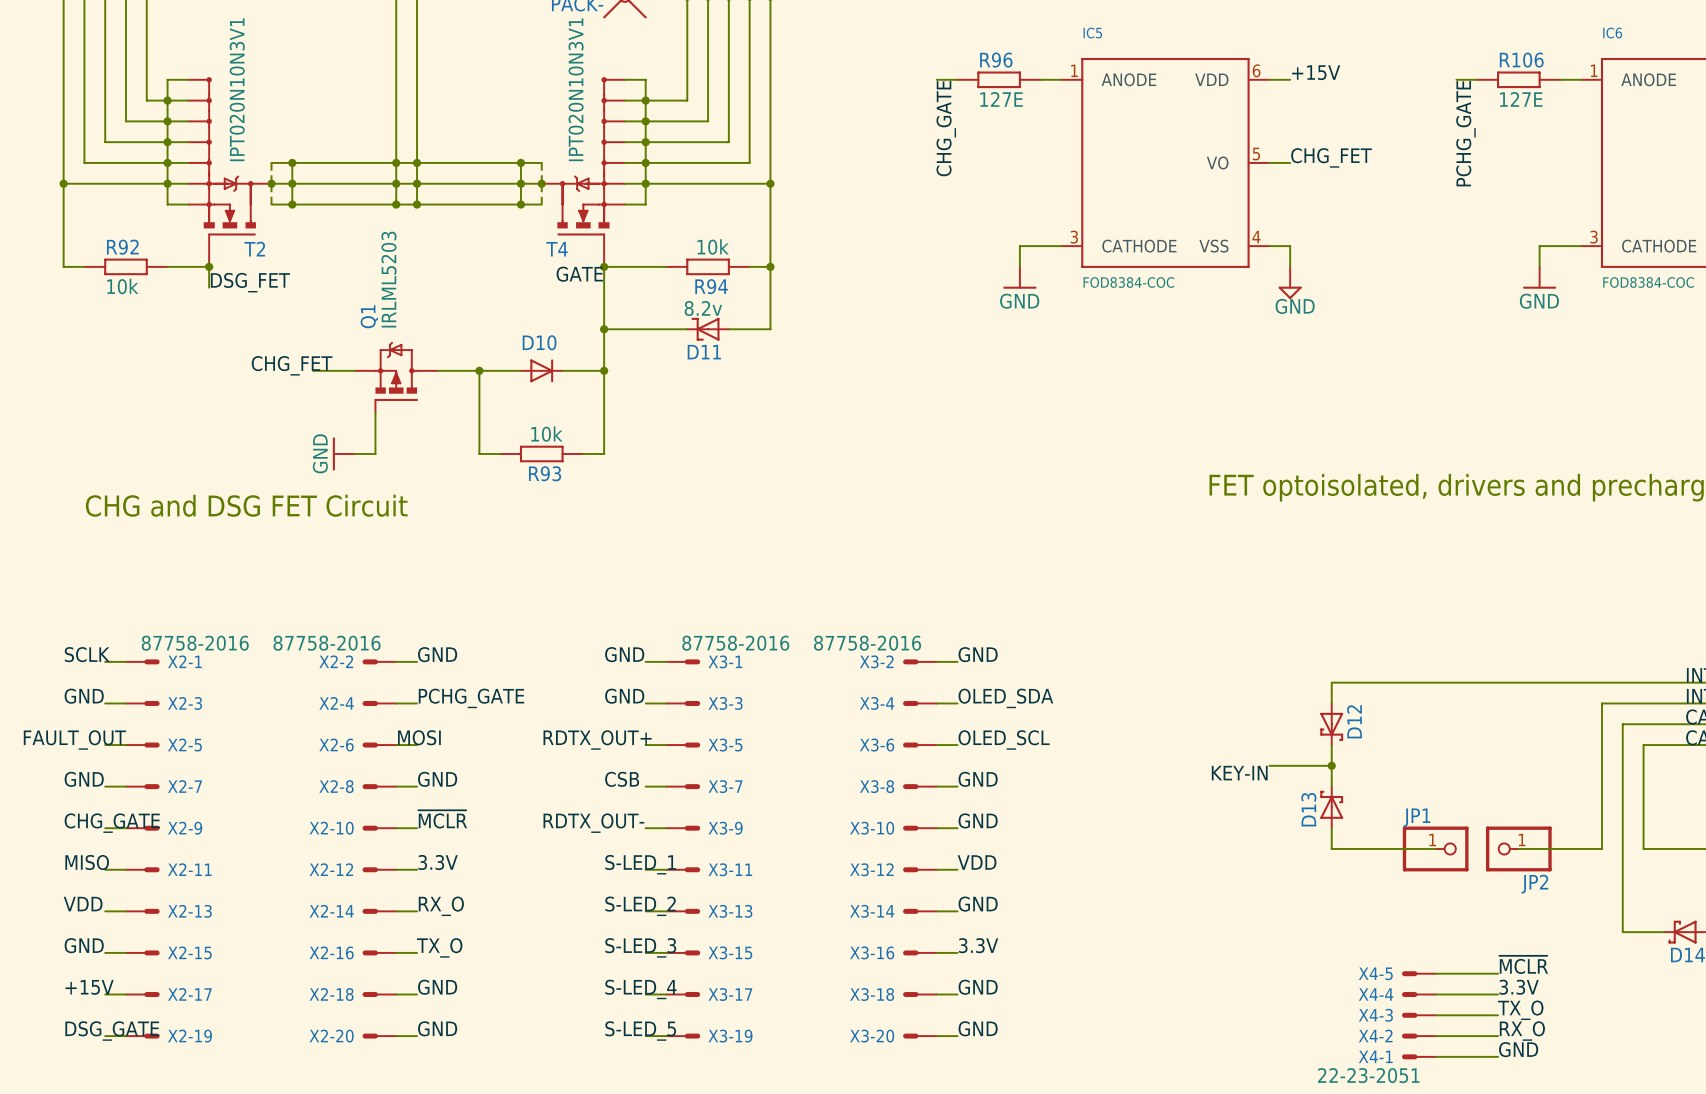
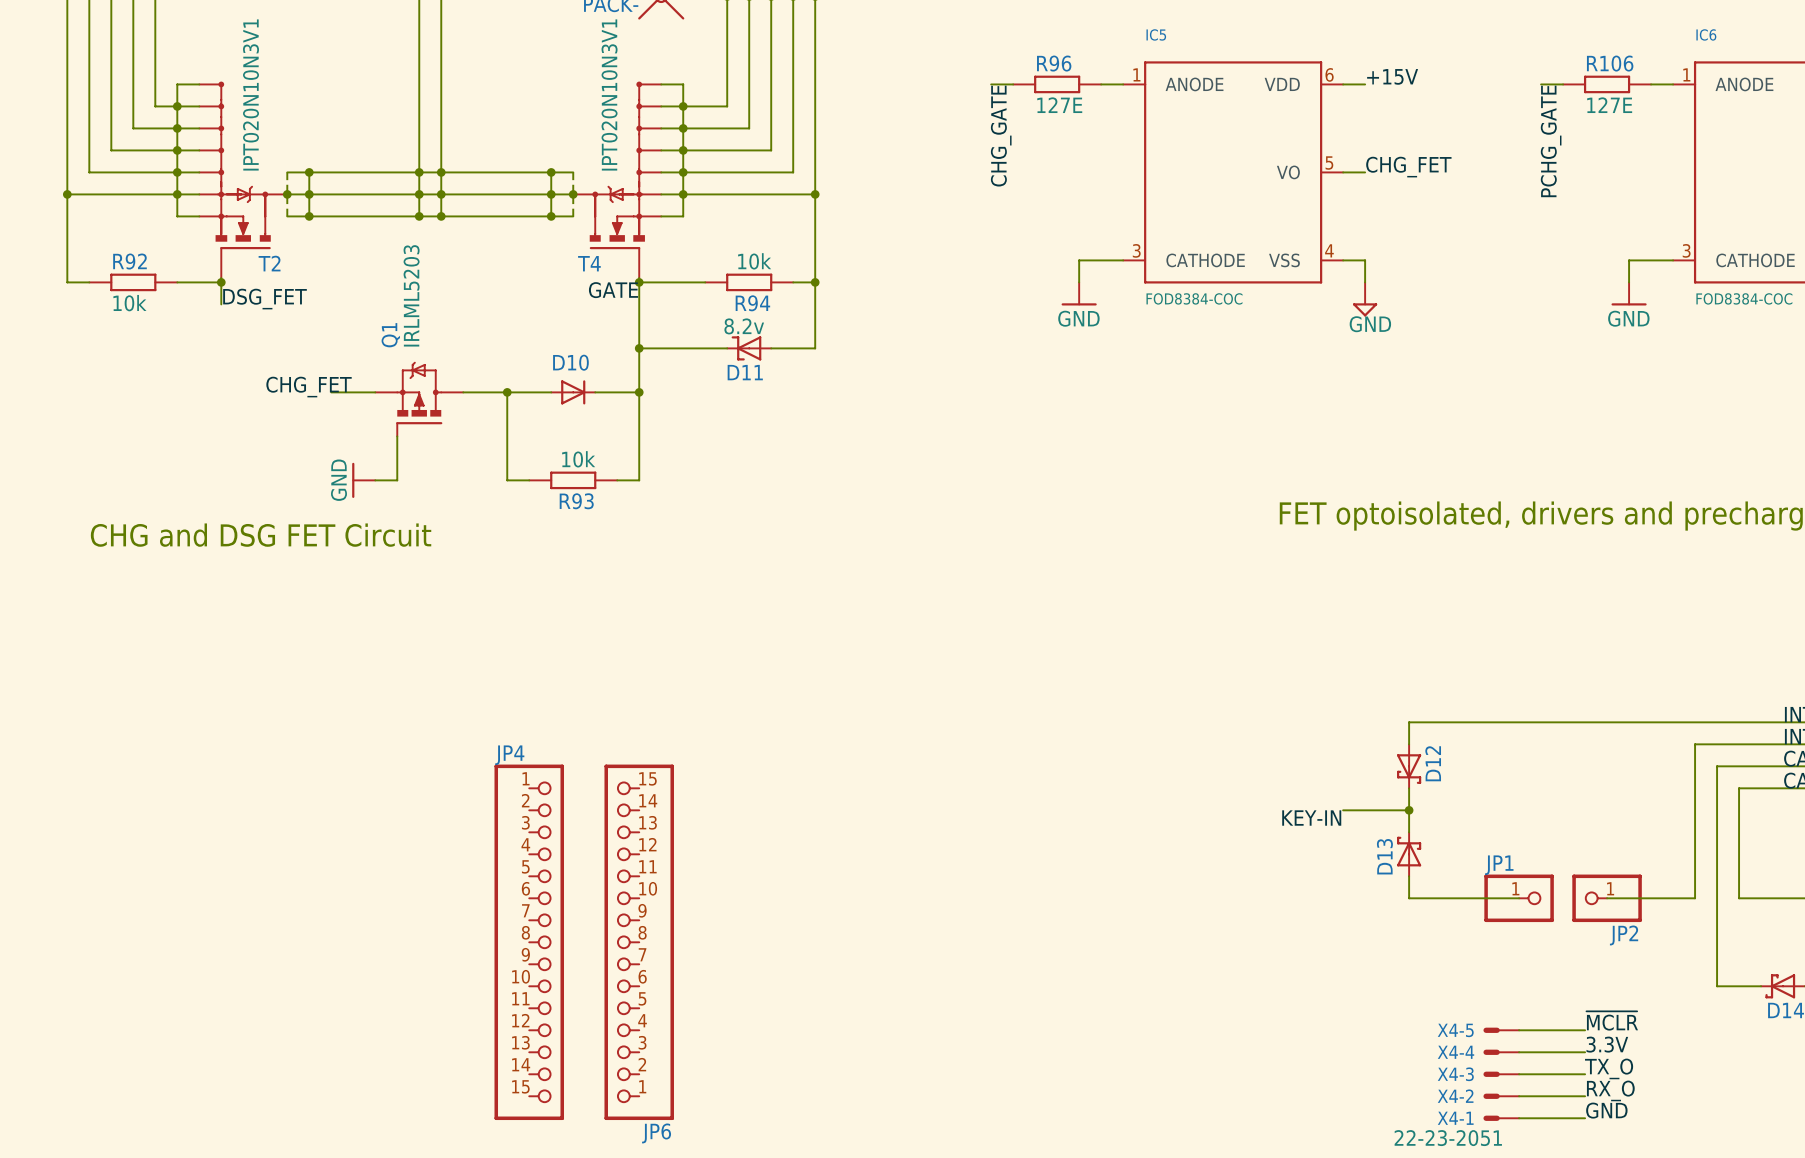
label: SCLK (87, 654) -> none
label: GND (437, 654) -> none
label: GND (624, 654) -> none
label: GND (978, 654) -> none
wire: (105, 661) (125, 661) -> none
X2-1: 87758-2016 (142, 661) -> none
X2-2: 87758-2016 (379, 661) -> none
wire: (396, 661) (417, 661) -> none
wire: (645, 661) (666, 661) -> none
X3-1: 87758-2016 (683, 661) -> none
X3-2: 87758-2016 (919, 661) -> none
wire: (936, 661) (957, 661) -> none
label: GND (84, 696) -> none
label: GND (624, 696) -> none
label: PCHG_GATE (471, 698) -> none
label: OLED_SDA (1005, 698) -> none
wire: (105, 703) (125, 703) -> none
X2-3: (142, 703) -> none
X2-4: (379, 703) -> none
wire: (396, 703) (417, 703) -> none
wire: (645, 703) (666, 703) -> none
X3-3: (683, 703) -> none
X3-4: (919, 703) -> none
wire: (936, 703) (957, 703) -> none
label: MOSI (419, 737) -> none
label: FAULT_OUT (74, 739) -> none
label: RDTX_OUT+ (597, 739) -> none
label: OLED_SCL (1004, 739) -> none
wire: (105, 745) (125, 745) -> none
X2-5: (142, 745) -> none
X2-6: (379, 745) -> none
wire: (396, 745) (417, 745) -> none
wire: (645, 745) (666, 745) -> none
X3-5: (683, 745) -> none
X3-6: (919, 745) -> none
wire: (936, 745) (957, 745) -> none
label: GND (84, 779) -> none
label: GND (437, 779) -> none
label: CSB (622, 779) -> none
label: GND (978, 779) -> none
wire: (105, 786) (125, 786) -> none
X2-7: (142, 786) -> none
X2-8: (379, 786) -> none
wire: (396, 786) (417, 786) -> none
wire: (645, 786) (666, 786) -> none
X3-7: (683, 786) -> none
X3-8: (919, 786) -> none
wire: (936, 786) (957, 786) -> none
label: ~{MCLR} (442, 819) -> none
label: GND (978, 820) -> none
label: CHG_GATE (112, 823) -> none
label: RDTX_OUT- (593, 823) -> none
wire: (105, 828) (125, 828) -> none
X2-9: (142, 828) -> none
X2-10: (379, 828) -> none
wire: (396, 828) (417, 828) -> none
wire: (645, 828) (666, 828) -> none
X3-9: (683, 828) -> none
X3-10: (919, 828) -> none
wire: (936, 828) (957, 828) -> none
label: MISO (87, 862) -> none
label: 3.3V (438, 862) -> none
label: VDD (977, 862) -> none
label: S-LED_1 (640, 864) -> none
wire: (105, 869) (125, 869) -> none
X2-11: (142, 869) -> none
X2-12: (379, 869) -> none
wire: (396, 869) (417, 869) -> none
wire: (645, 869) (666, 869) -> none
X3-11: (683, 869) -> none
X3-12: (919, 869) -> none
wire: (936, 869) (957, 869) -> none
JP4: none -> (529, 942)
JP6: none -> (639, 942)
label: VDD (83, 904) -> none
label: GND (978, 904) -> none
label: RX_O (441, 906) -> none
label: S-LED_2 (640, 906) -> none
wire: (105, 911) (125, 911) -> none
X2-13: (142, 911) -> none
X2-14: (379, 911) -> none
wire: (396, 911) (417, 911) -> none
wire: (645, 911) (666, 911) -> none
X3-13: (683, 911) -> none
X3-14: (919, 911) -> none
wire: (936, 911) (957, 911) -> none
label: GND (84, 945) -> none
label: 3.3V (978, 945) -> none
label: TX_O (439, 947) -> none
label: S-LED_3 (640, 947) -> none
wire: (105, 952) (125, 952) -> none
X2-15: (142, 952) -> none
X2-16: (379, 952) -> none
wire: (396, 952) (417, 952) -> none
wire: (645, 952) (666, 952) -> none
X3-15: (683, 952) -> none
X3-16: (919, 952) -> none
wire: (936, 952) (957, 952) -> none
label: +15V (89, 987) -> none
label: GND (437, 987) -> none
label: GND (978, 987) -> none
label: S-LED_4 (640, 989) -> none
wire: (105, 994) (125, 994) -> none
X2-17: (142, 994) -> none
X2-18: (379, 994) -> none
wire: (396, 994) (417, 994) -> none
wire: (645, 994) (666, 994) -> none
X3-17: (683, 994) -> none
X3-18: (919, 994) -> none
wire: (936, 994) (957, 994) -> none
label: GND (437, 1028) -> none
label: GND (978, 1028) -> none
label: DSG_GATE (112, 1031) -> none
label: S-LED_5 (640, 1031) -> none
wire: (105, 1036) (125, 1036) -> none
X2-19: (142, 1036) -> none
X2-20: (379, 1036) -> none
wire: (396, 1036) (417, 1036) -> none
wire: (645, 1036) (666, 1036) -> none
X3-19: (683, 1036) -> none
X3-20: (919, 1036) -> none
wire: (936, 1036) (957, 1036) -> none

